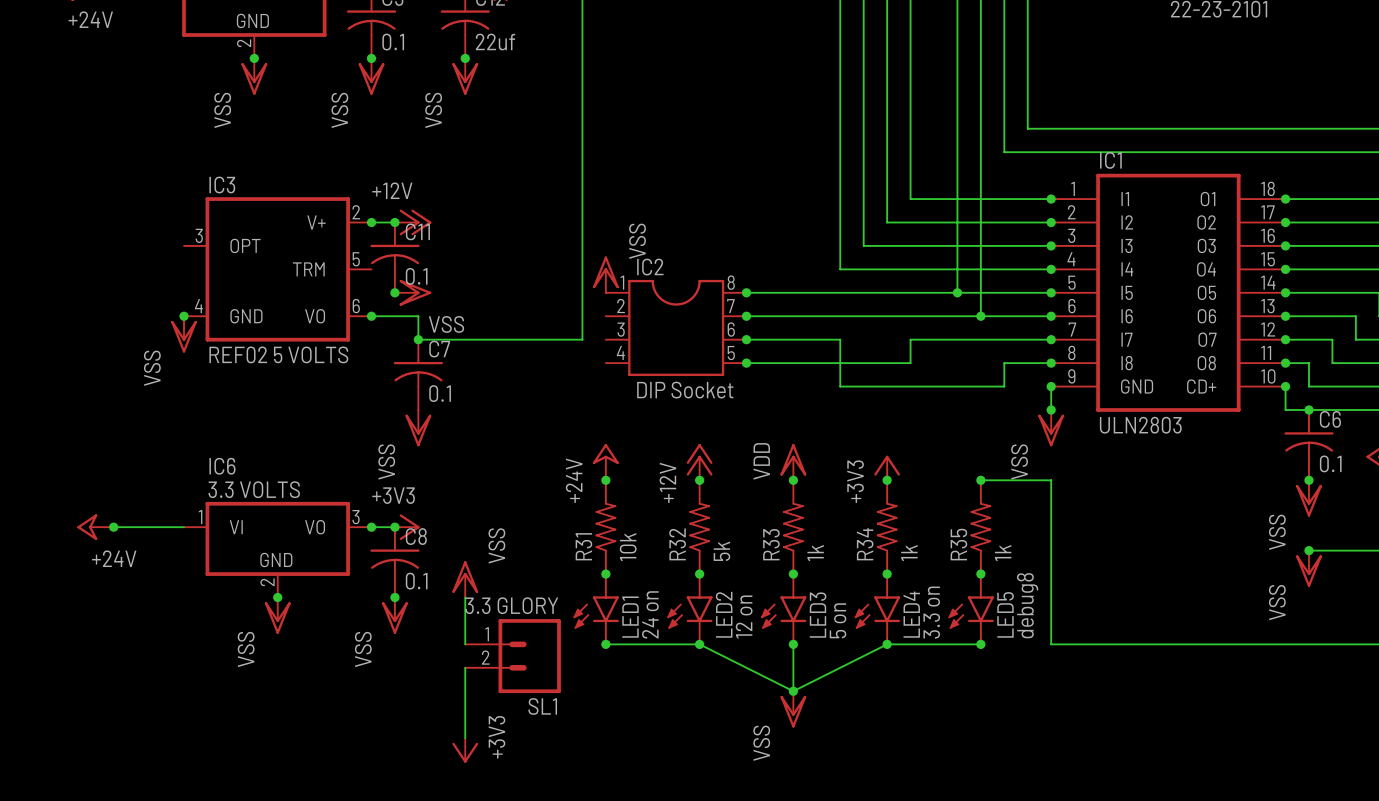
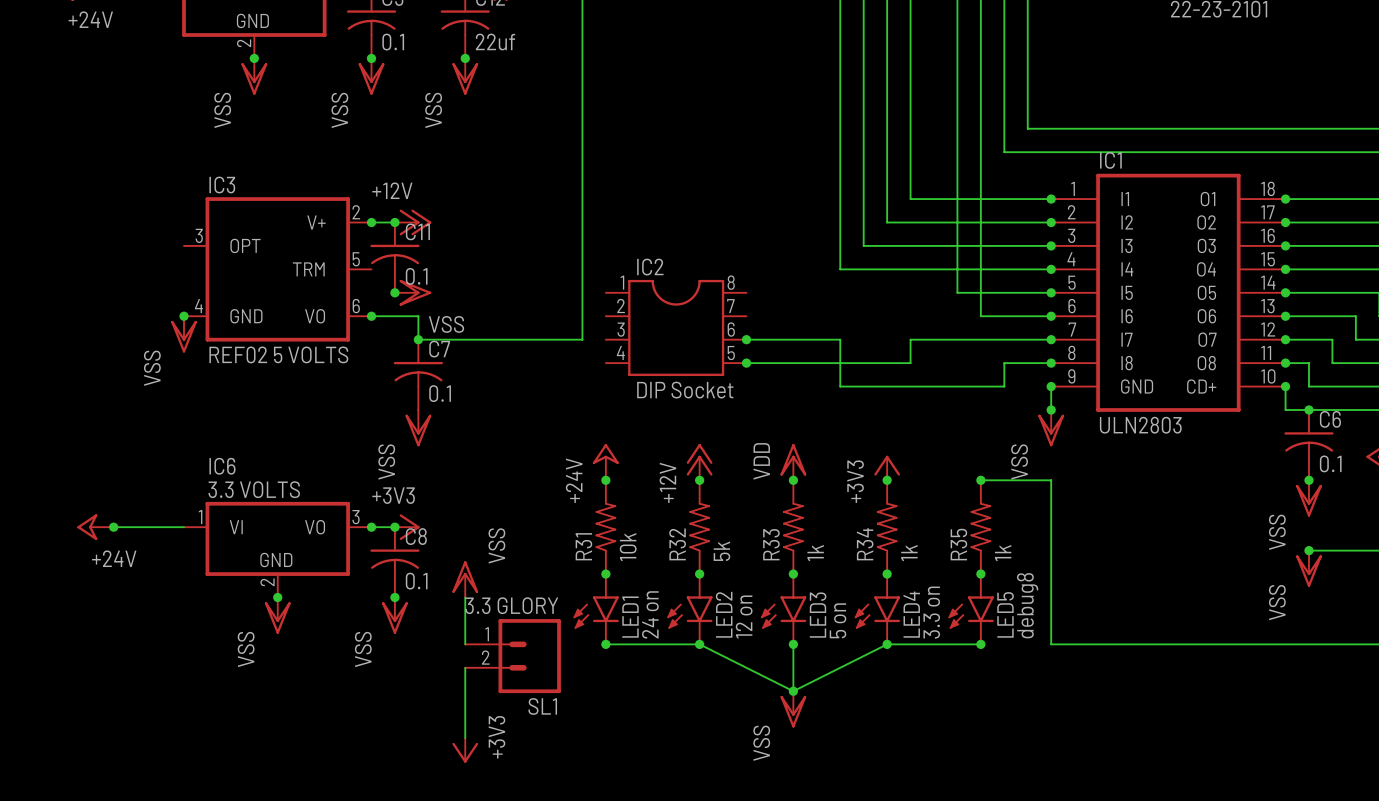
power symbol: VSS (605, 274) -> none
wire: (746, 292) (957, 292) -> none
junction: (746, 292) -> none
junction: (957, 292) -> none
wire: (746, 316) (980, 316) -> none
junction: (746, 316) -> none
junction: (980, 316) -> none

